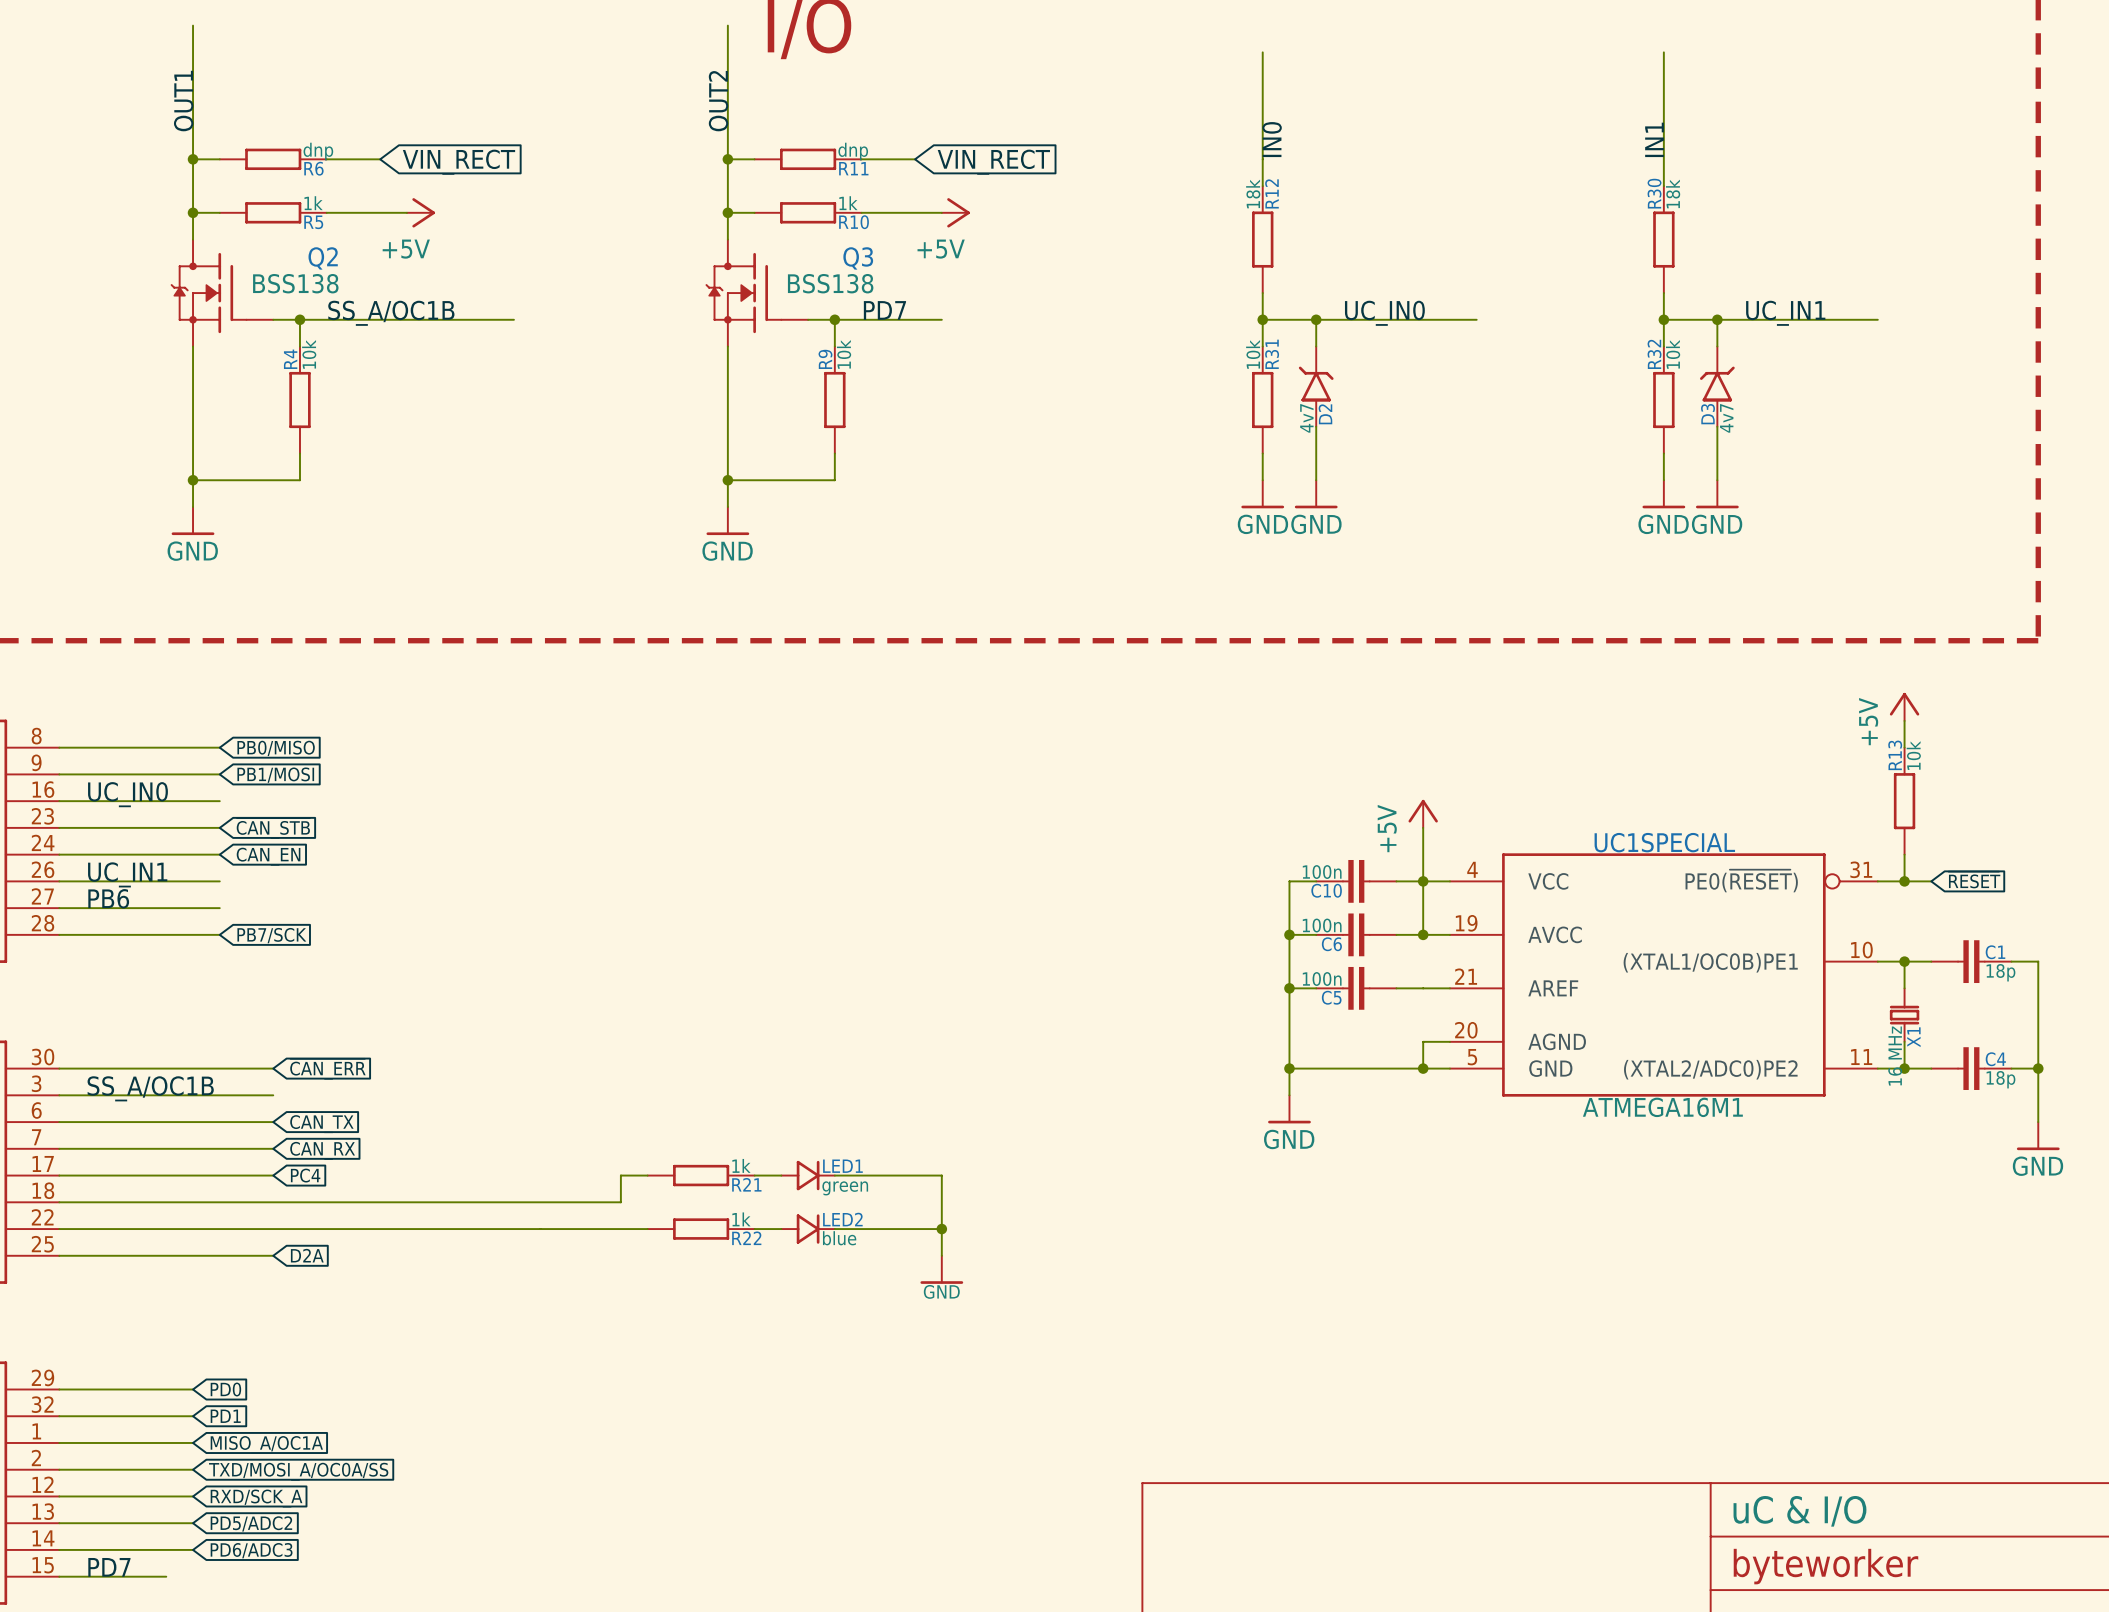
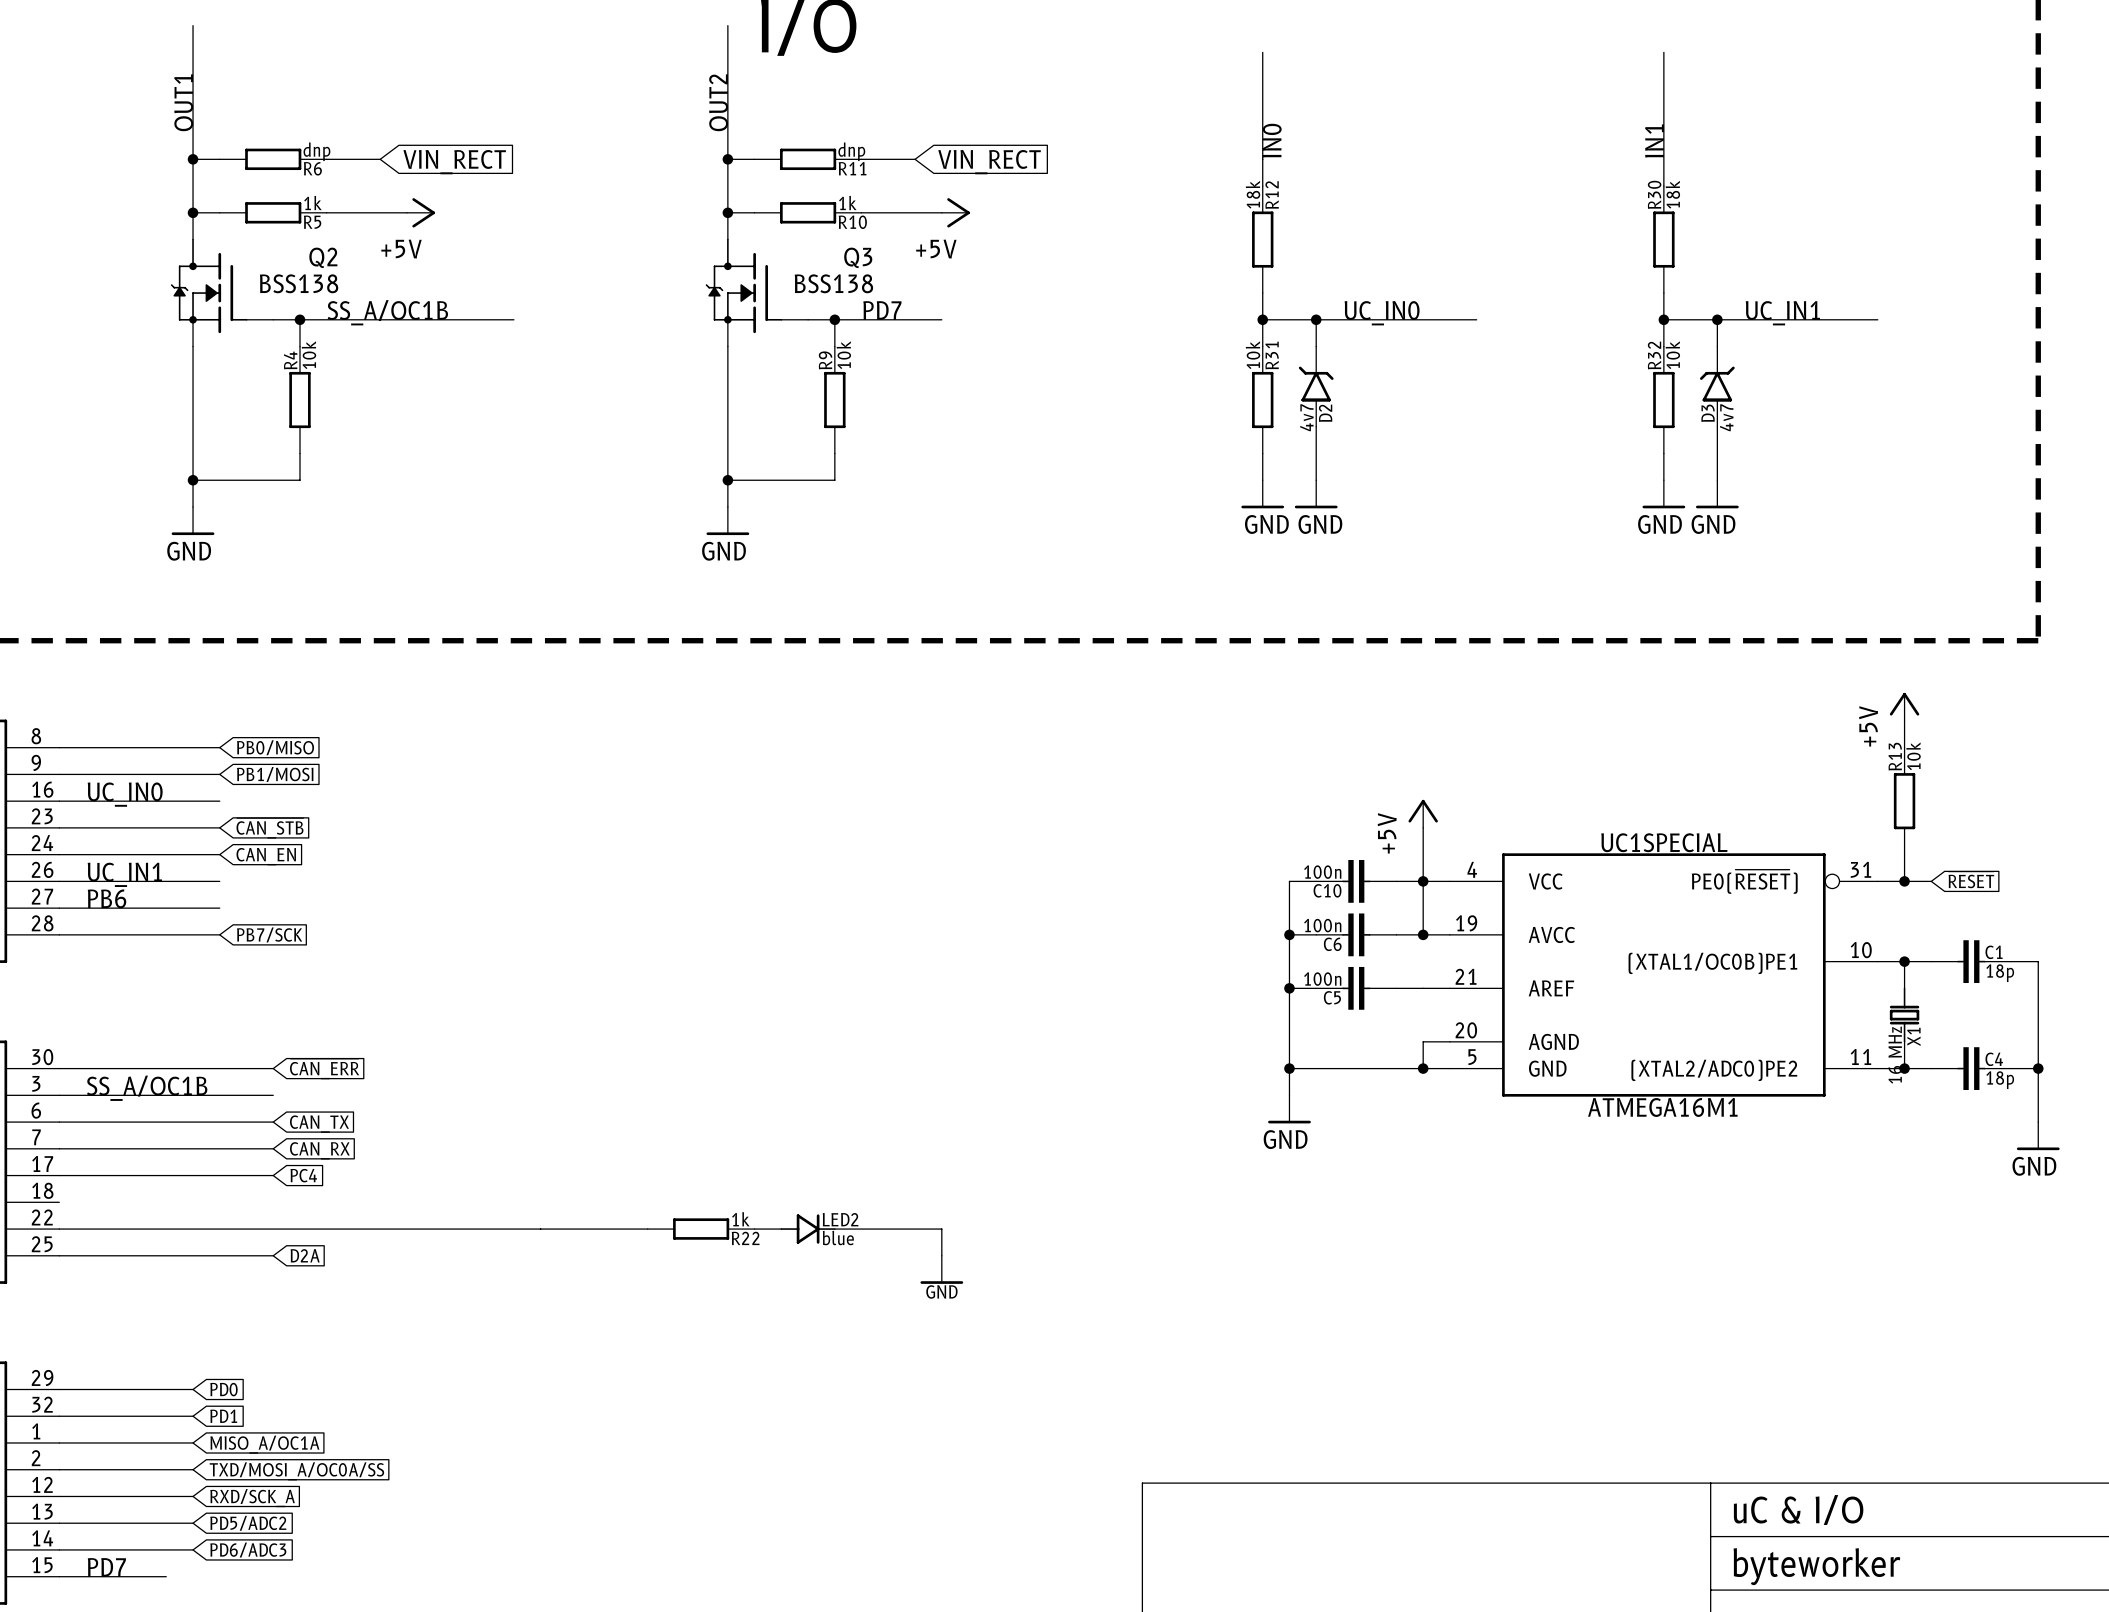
wire: (647, 1175) (620, 1175) (620, 1202) (59, 1202) -> none
R21: 1k (701, 1175) -> none
wire: (754, 1175) (781, 1175) -> none
LED1: green (808, 1175) -> none
wire: (834, 1175) (941, 1175) (941, 1229) -> none
junction: (941, 1229) -> none

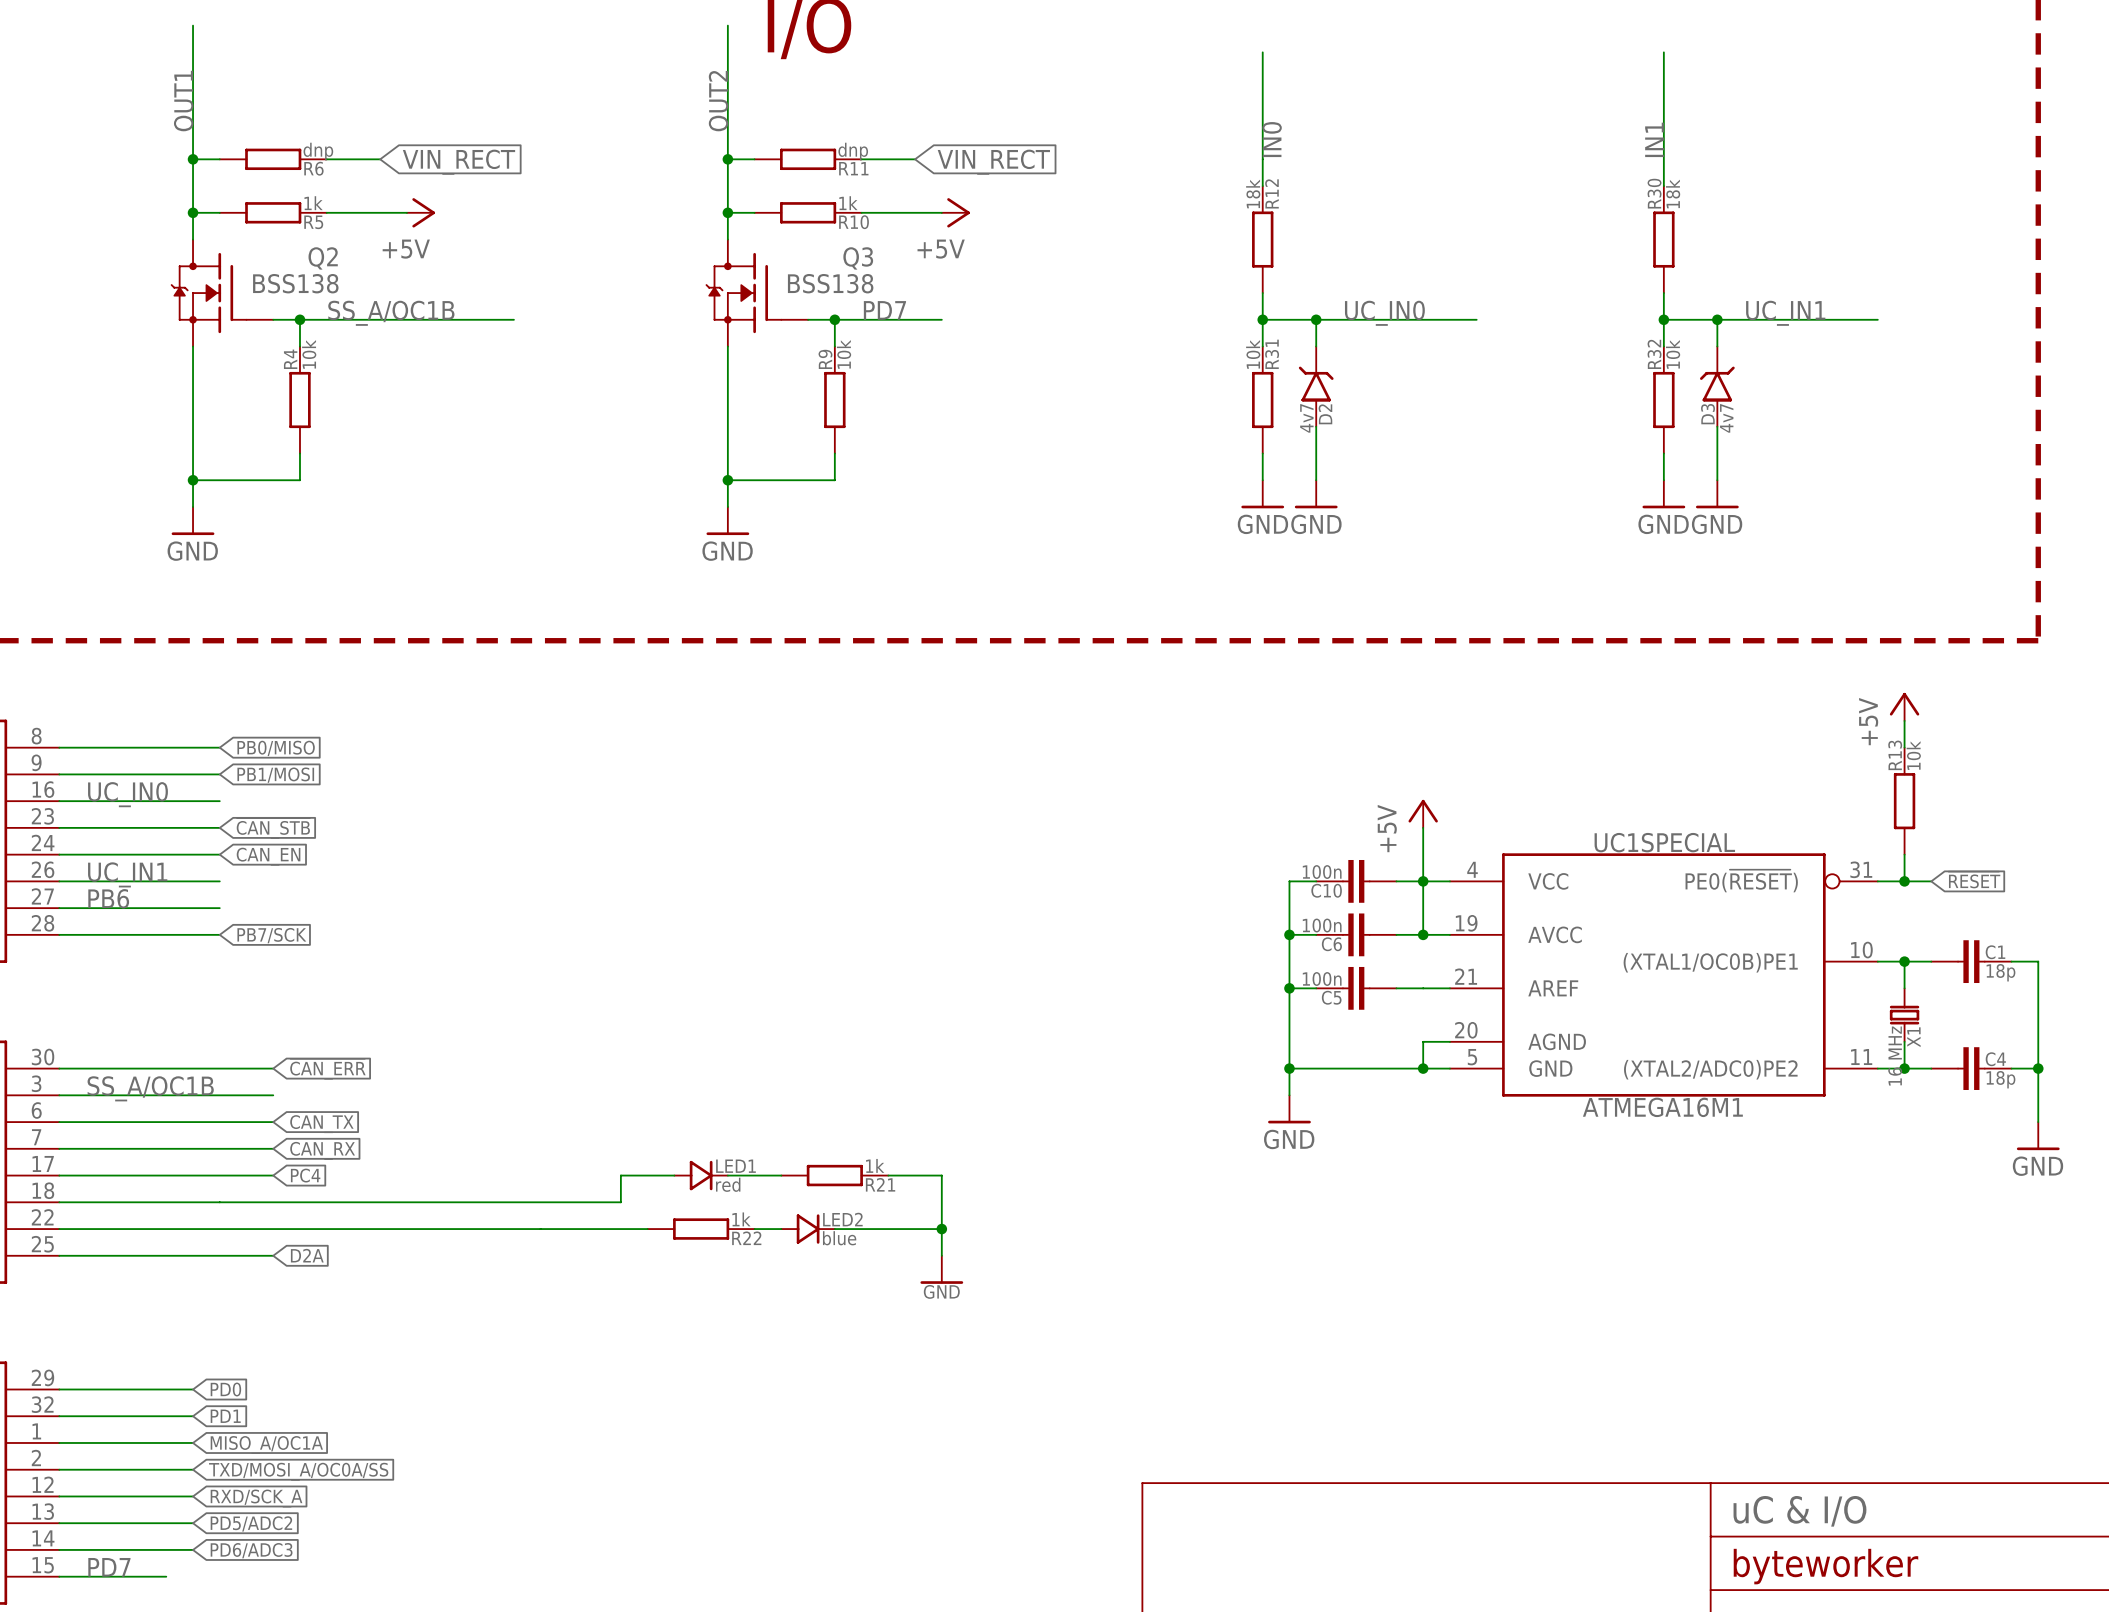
wire: none -> (674, 1175) (620, 1175) (620, 1202) (59, 1202)
LED1: none -> red (701, 1175)
wire: none -> (727, 1175) (781, 1175)
R21: none -> 1k (834, 1175)
wire: none -> (888, 1175) (941, 1175) (941, 1229)
junction: none -> (941, 1229)

